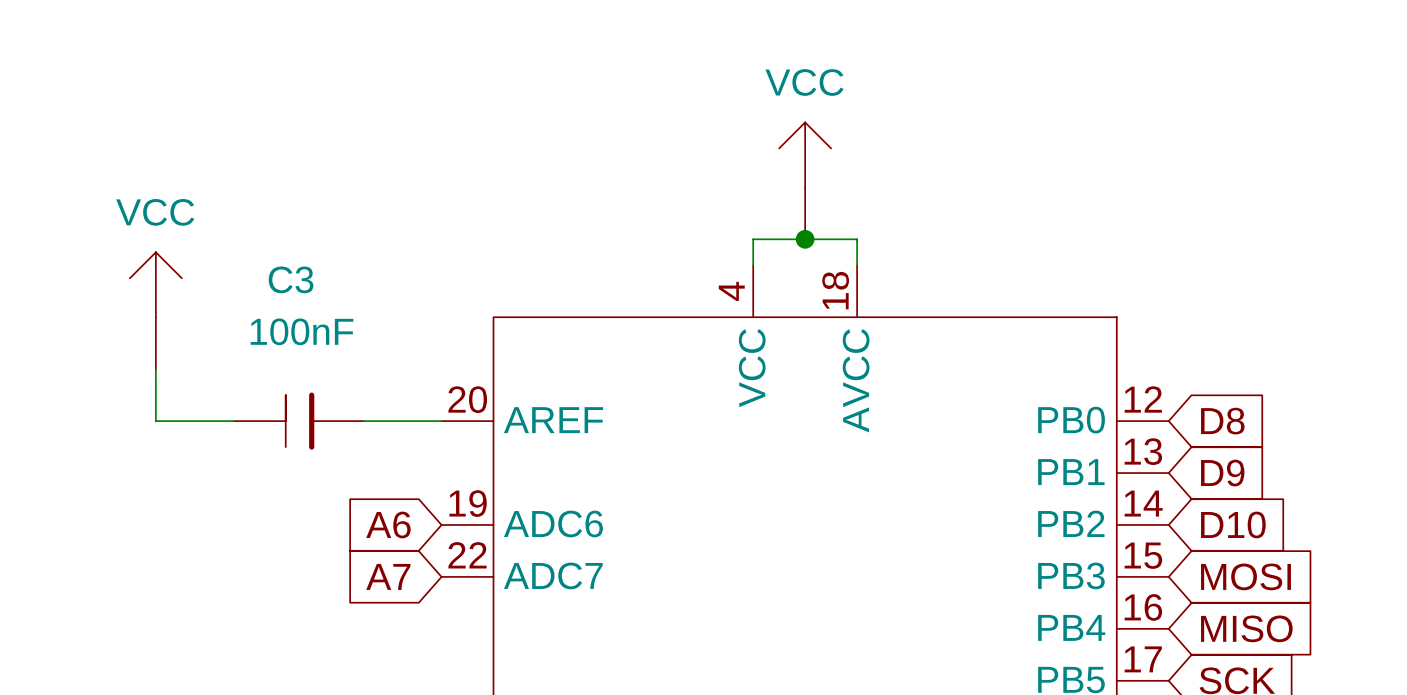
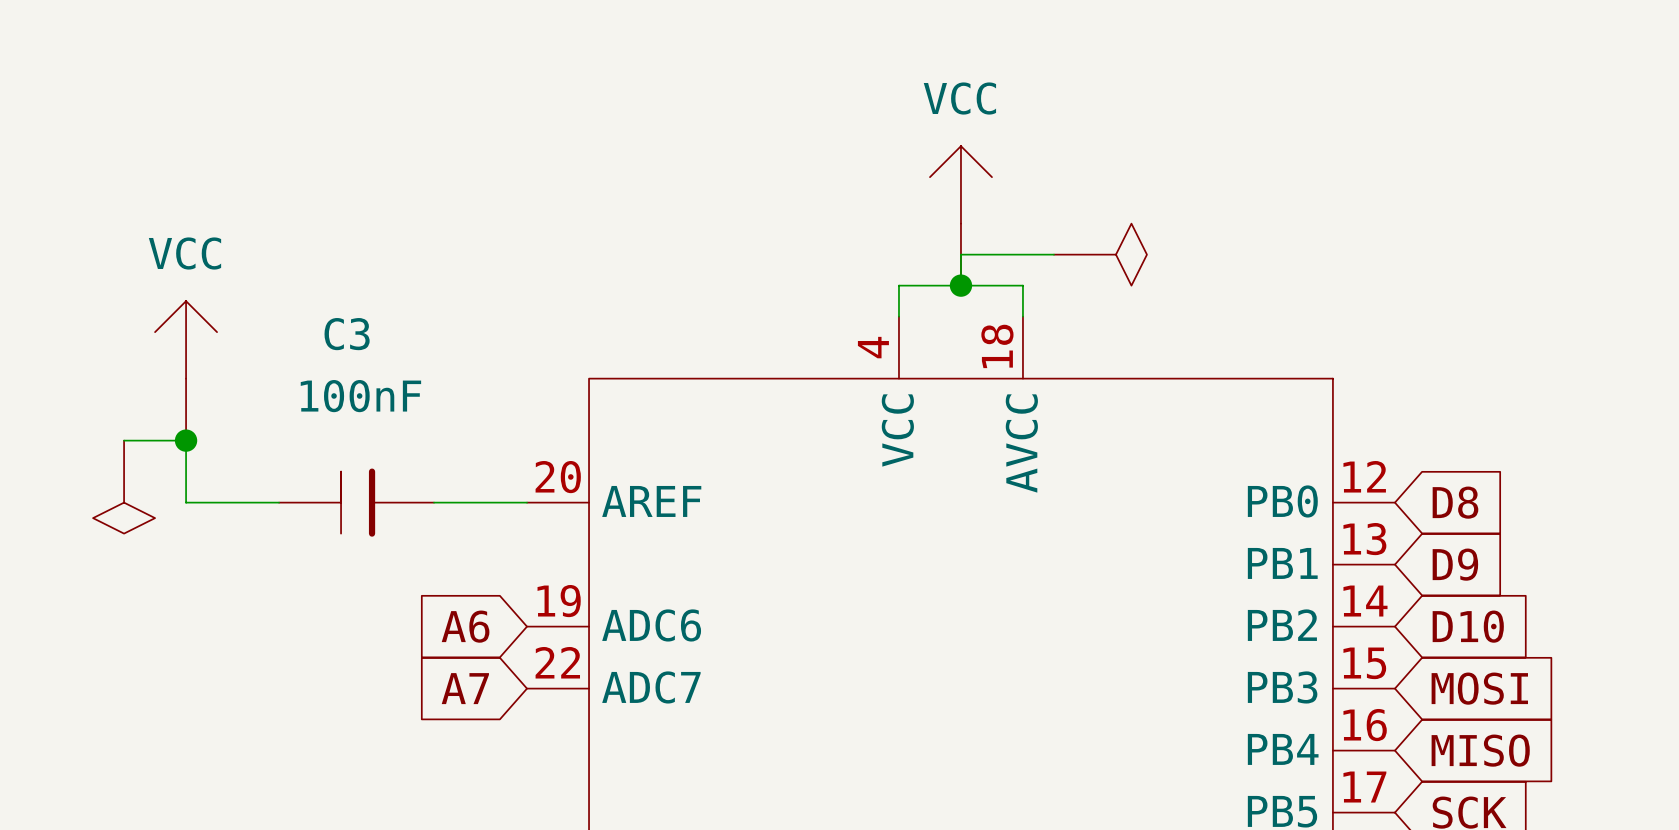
wire: none -> (1053, 254) (960, 254) (960, 285)
part: none -> (1100, 254)
wire: none -> (124, 440) (186, 440)
junction: none -> (186, 440)
part: none -> (124, 487)

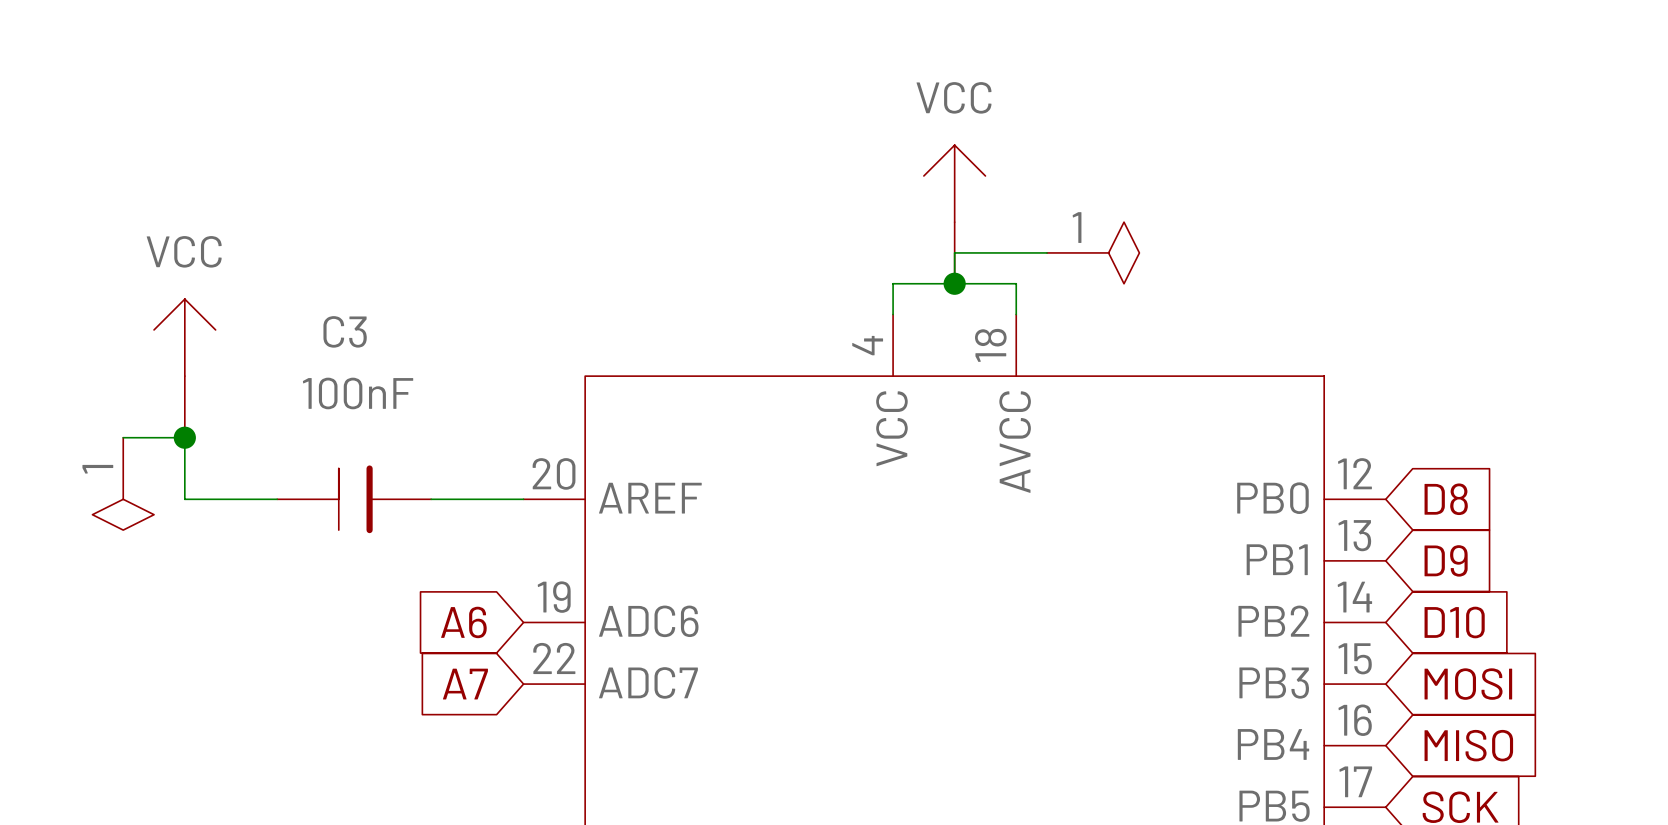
part pin number: none -> 1 (1077, 227)
part pin number: none -> 1 (97, 469)

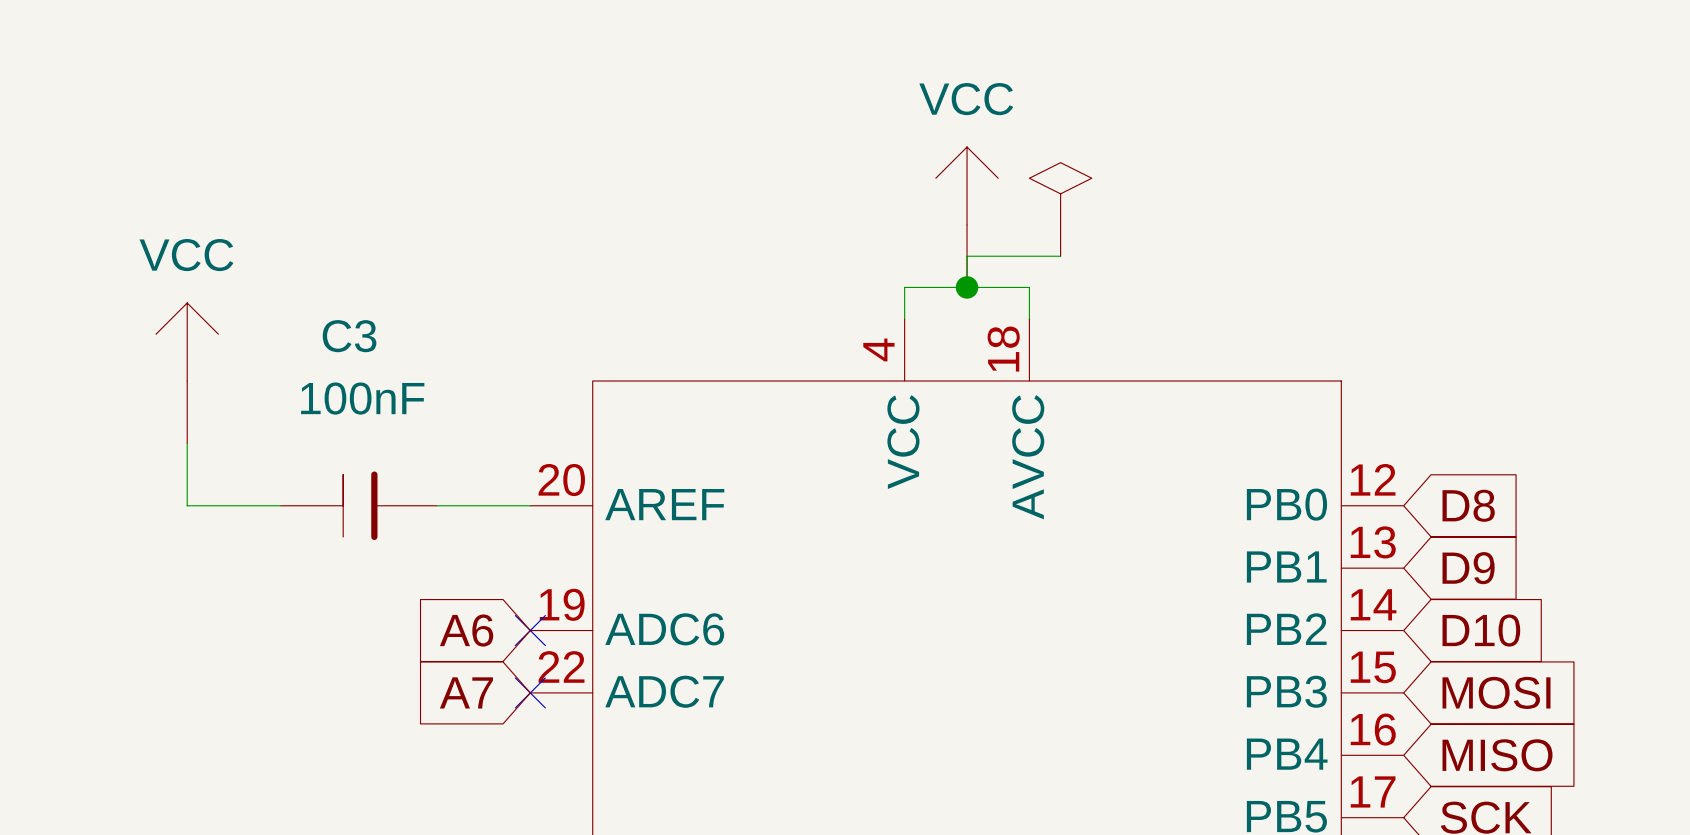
part: none -> (1060, 209)
part: (1093, 252) -> none
wire: (123, 437) (184, 437) -> none
junction: (184, 437) -> none
part: (123, 483) -> none
no-connect mark: none -> (530, 630)
no-connect mark: none -> (530, 692)

